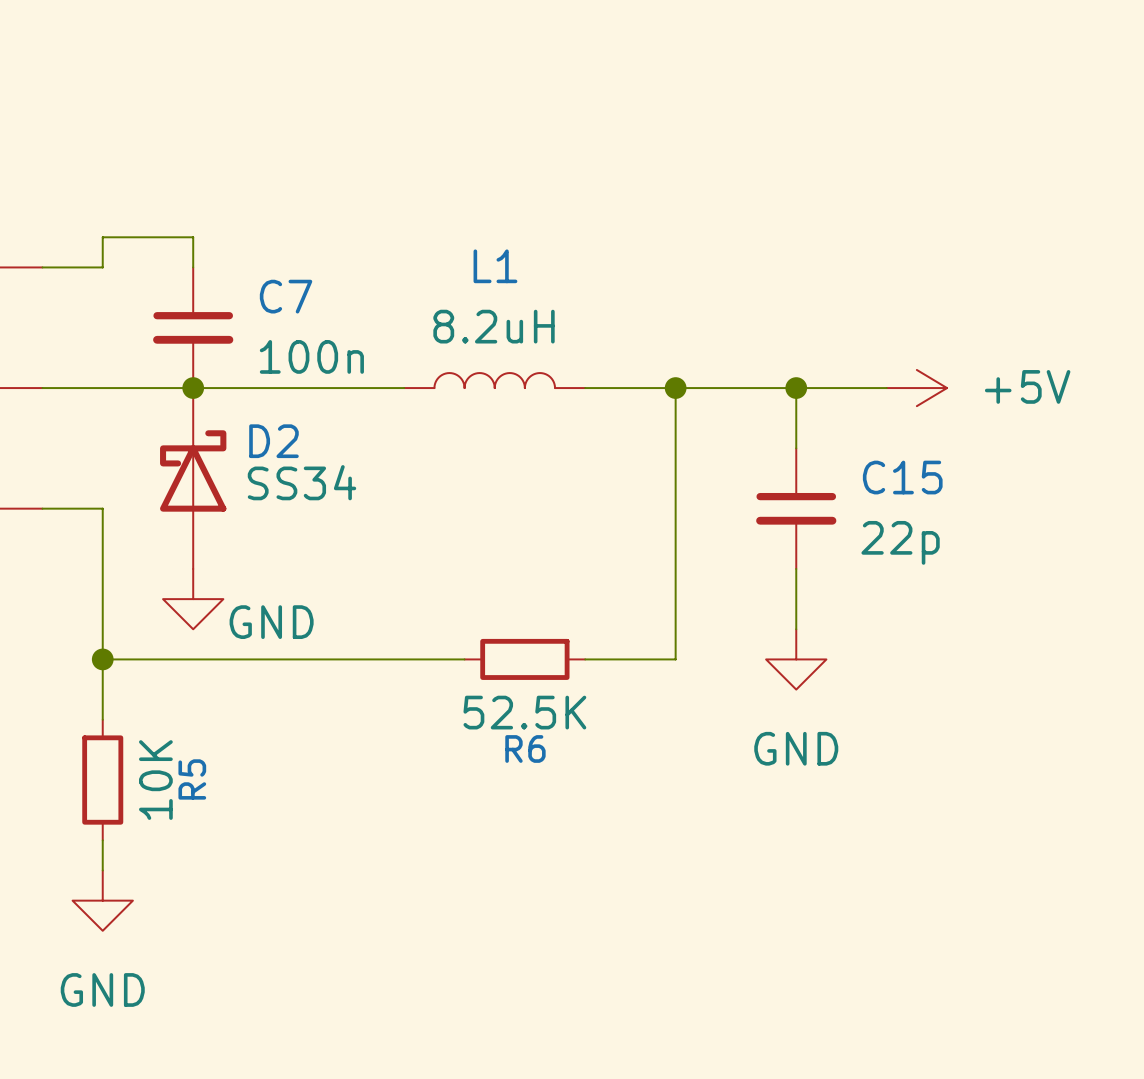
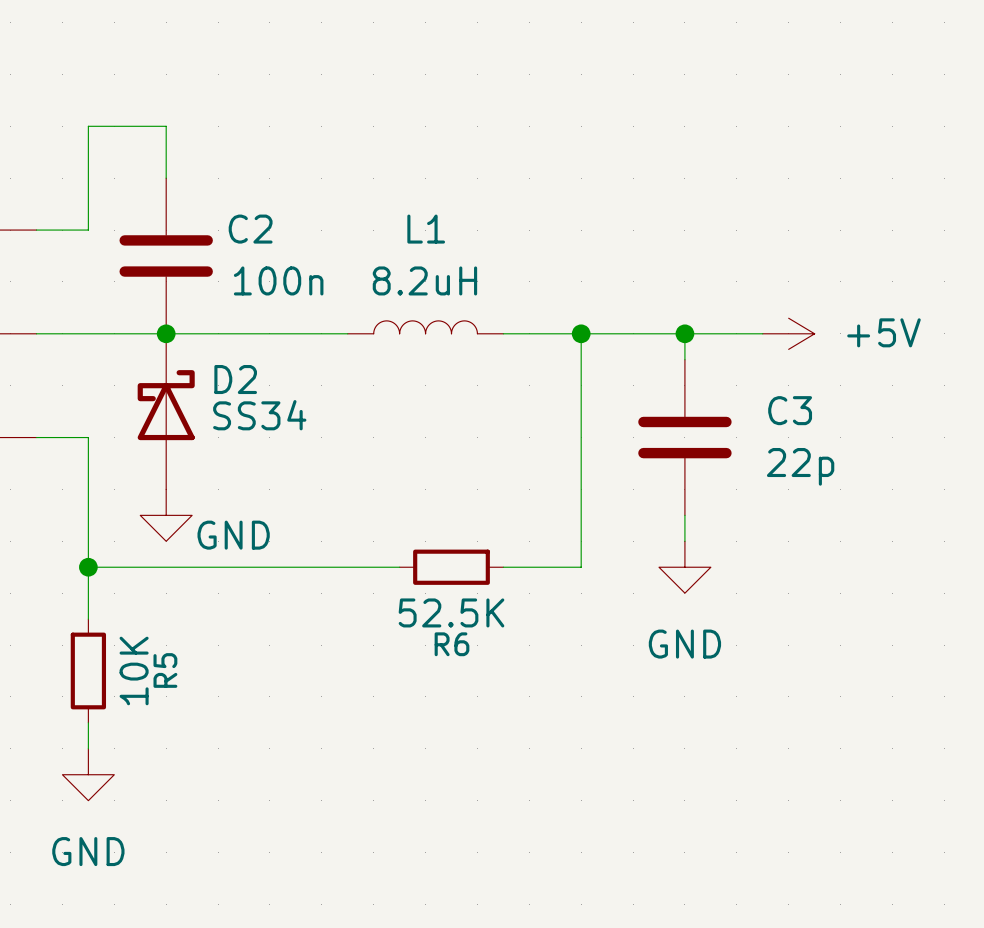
wire: (102, 237) (193, 237) (193, 267) -> (88, 204) (88, 126) (166, 126) (166, 178)
C2: none -> 100n (166, 255)
C7: 100n (193, 327) -> none
C15: 22p (796, 508) -> none
C3: none -> 22p (684, 437)

